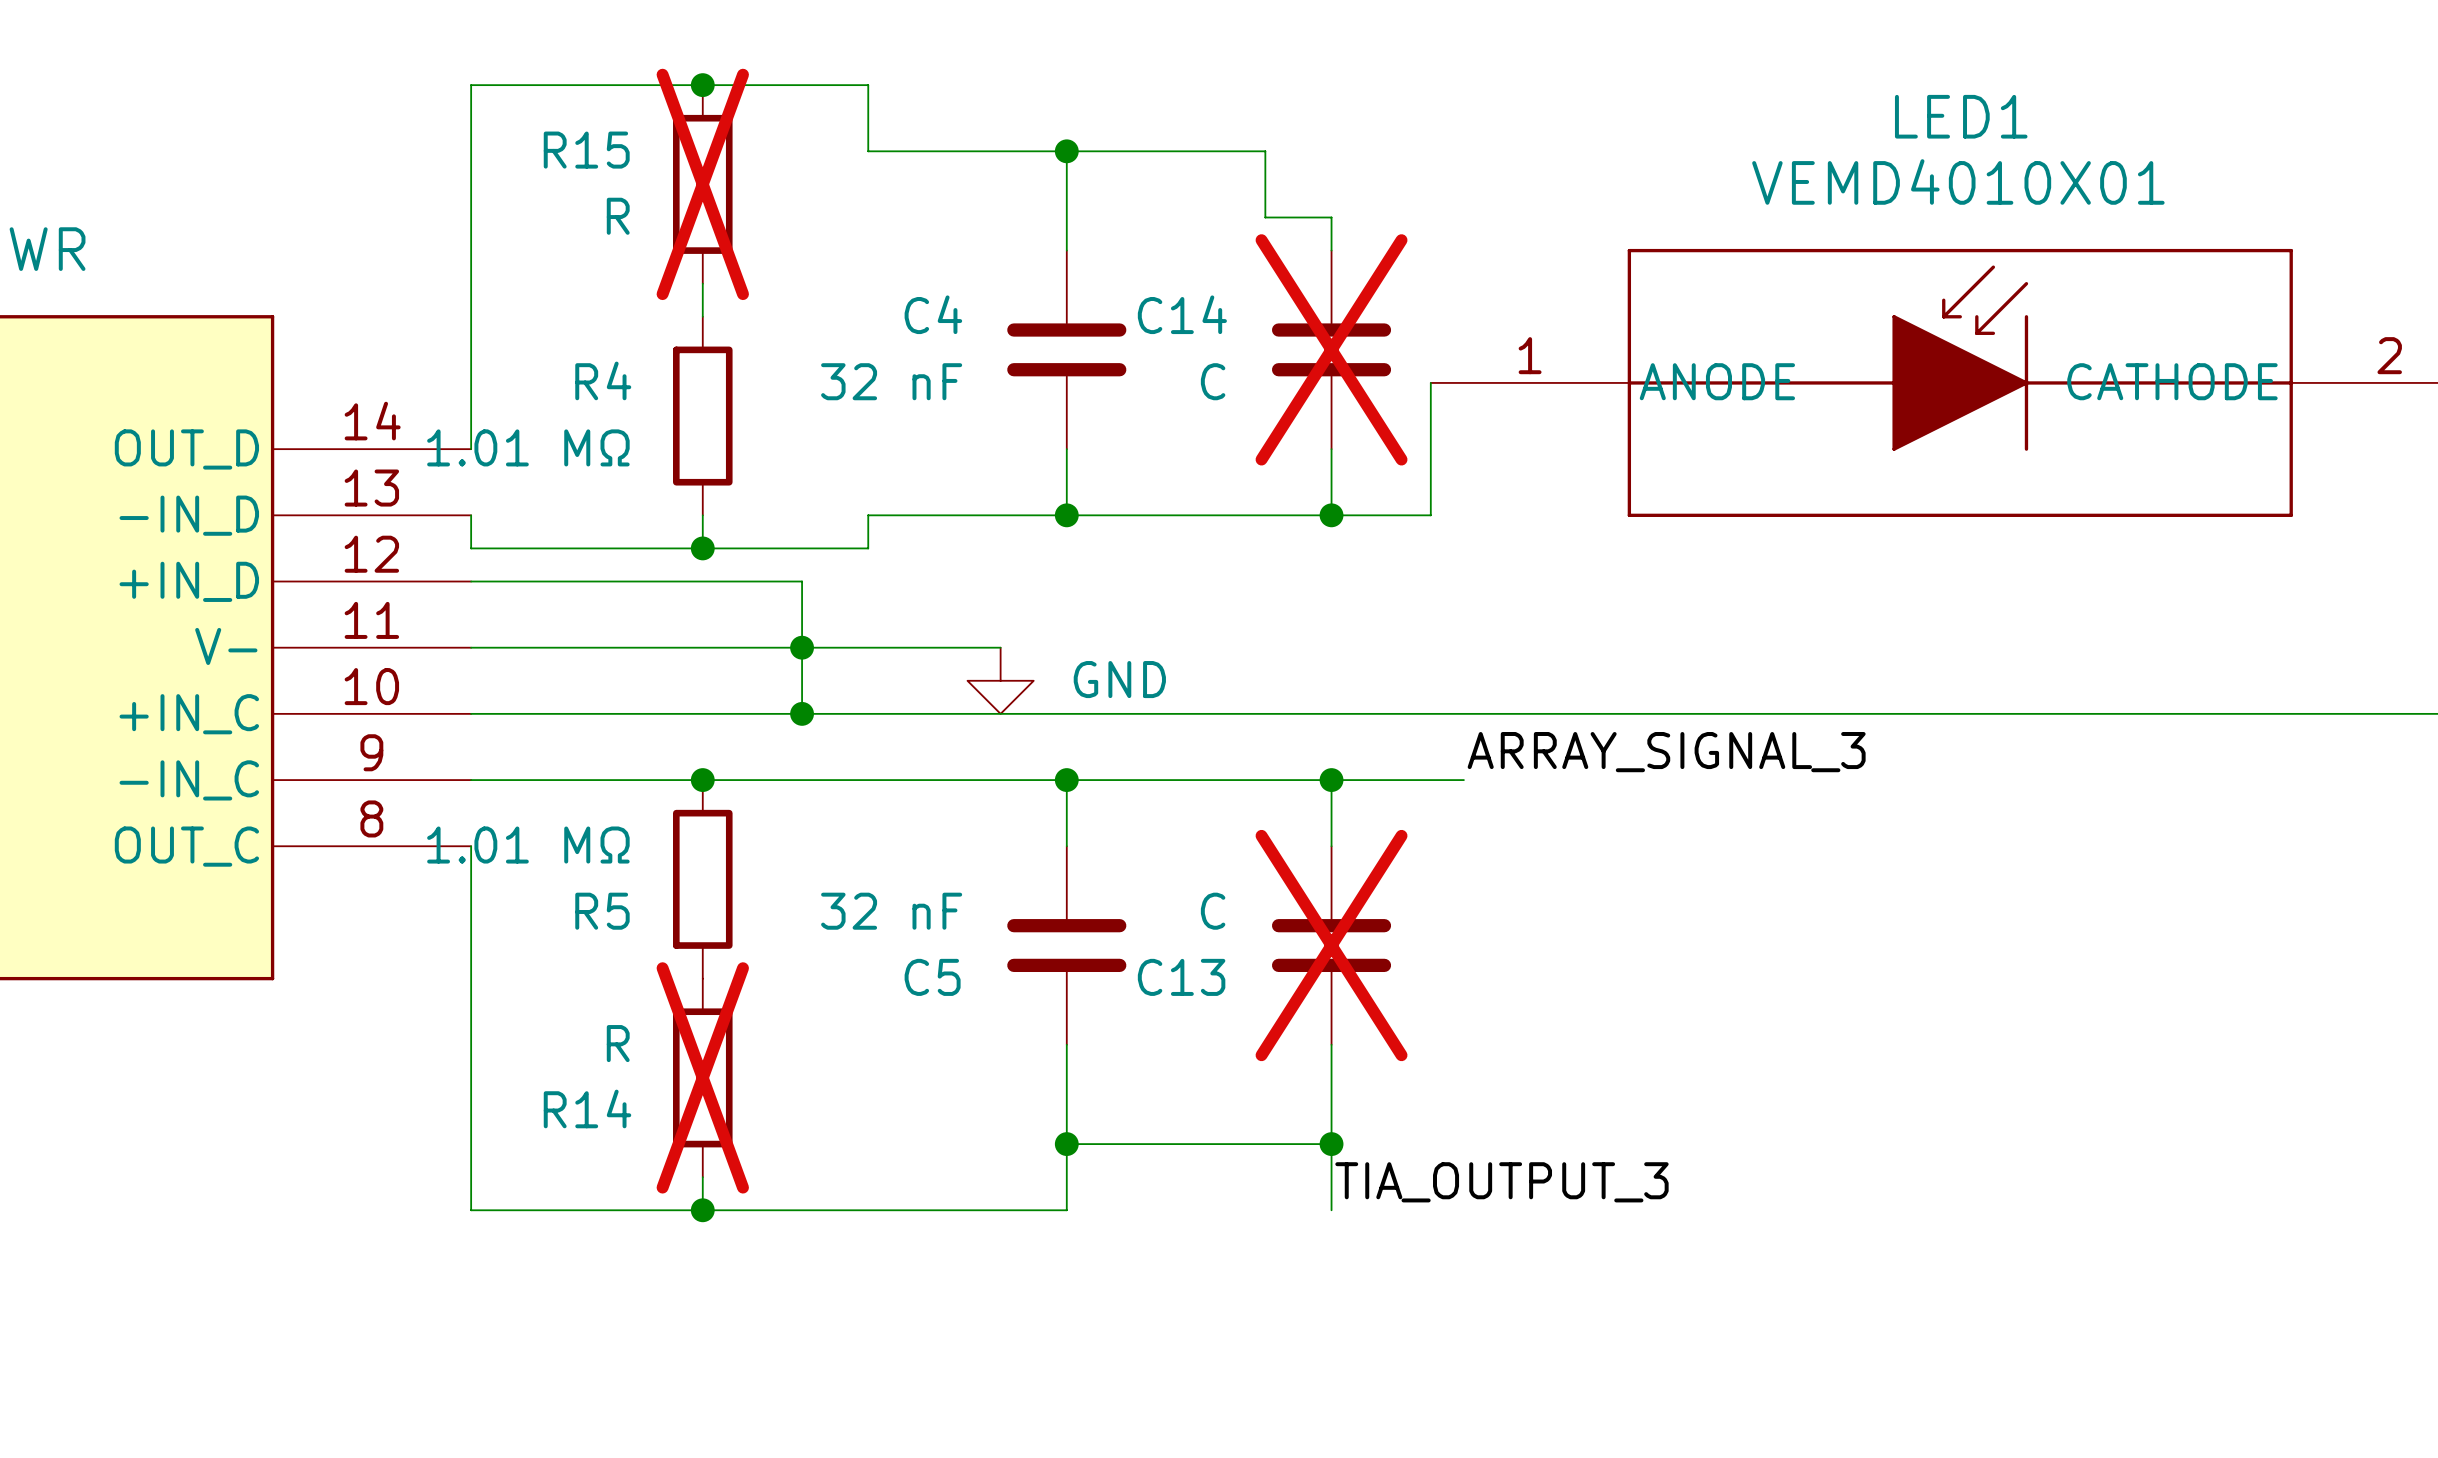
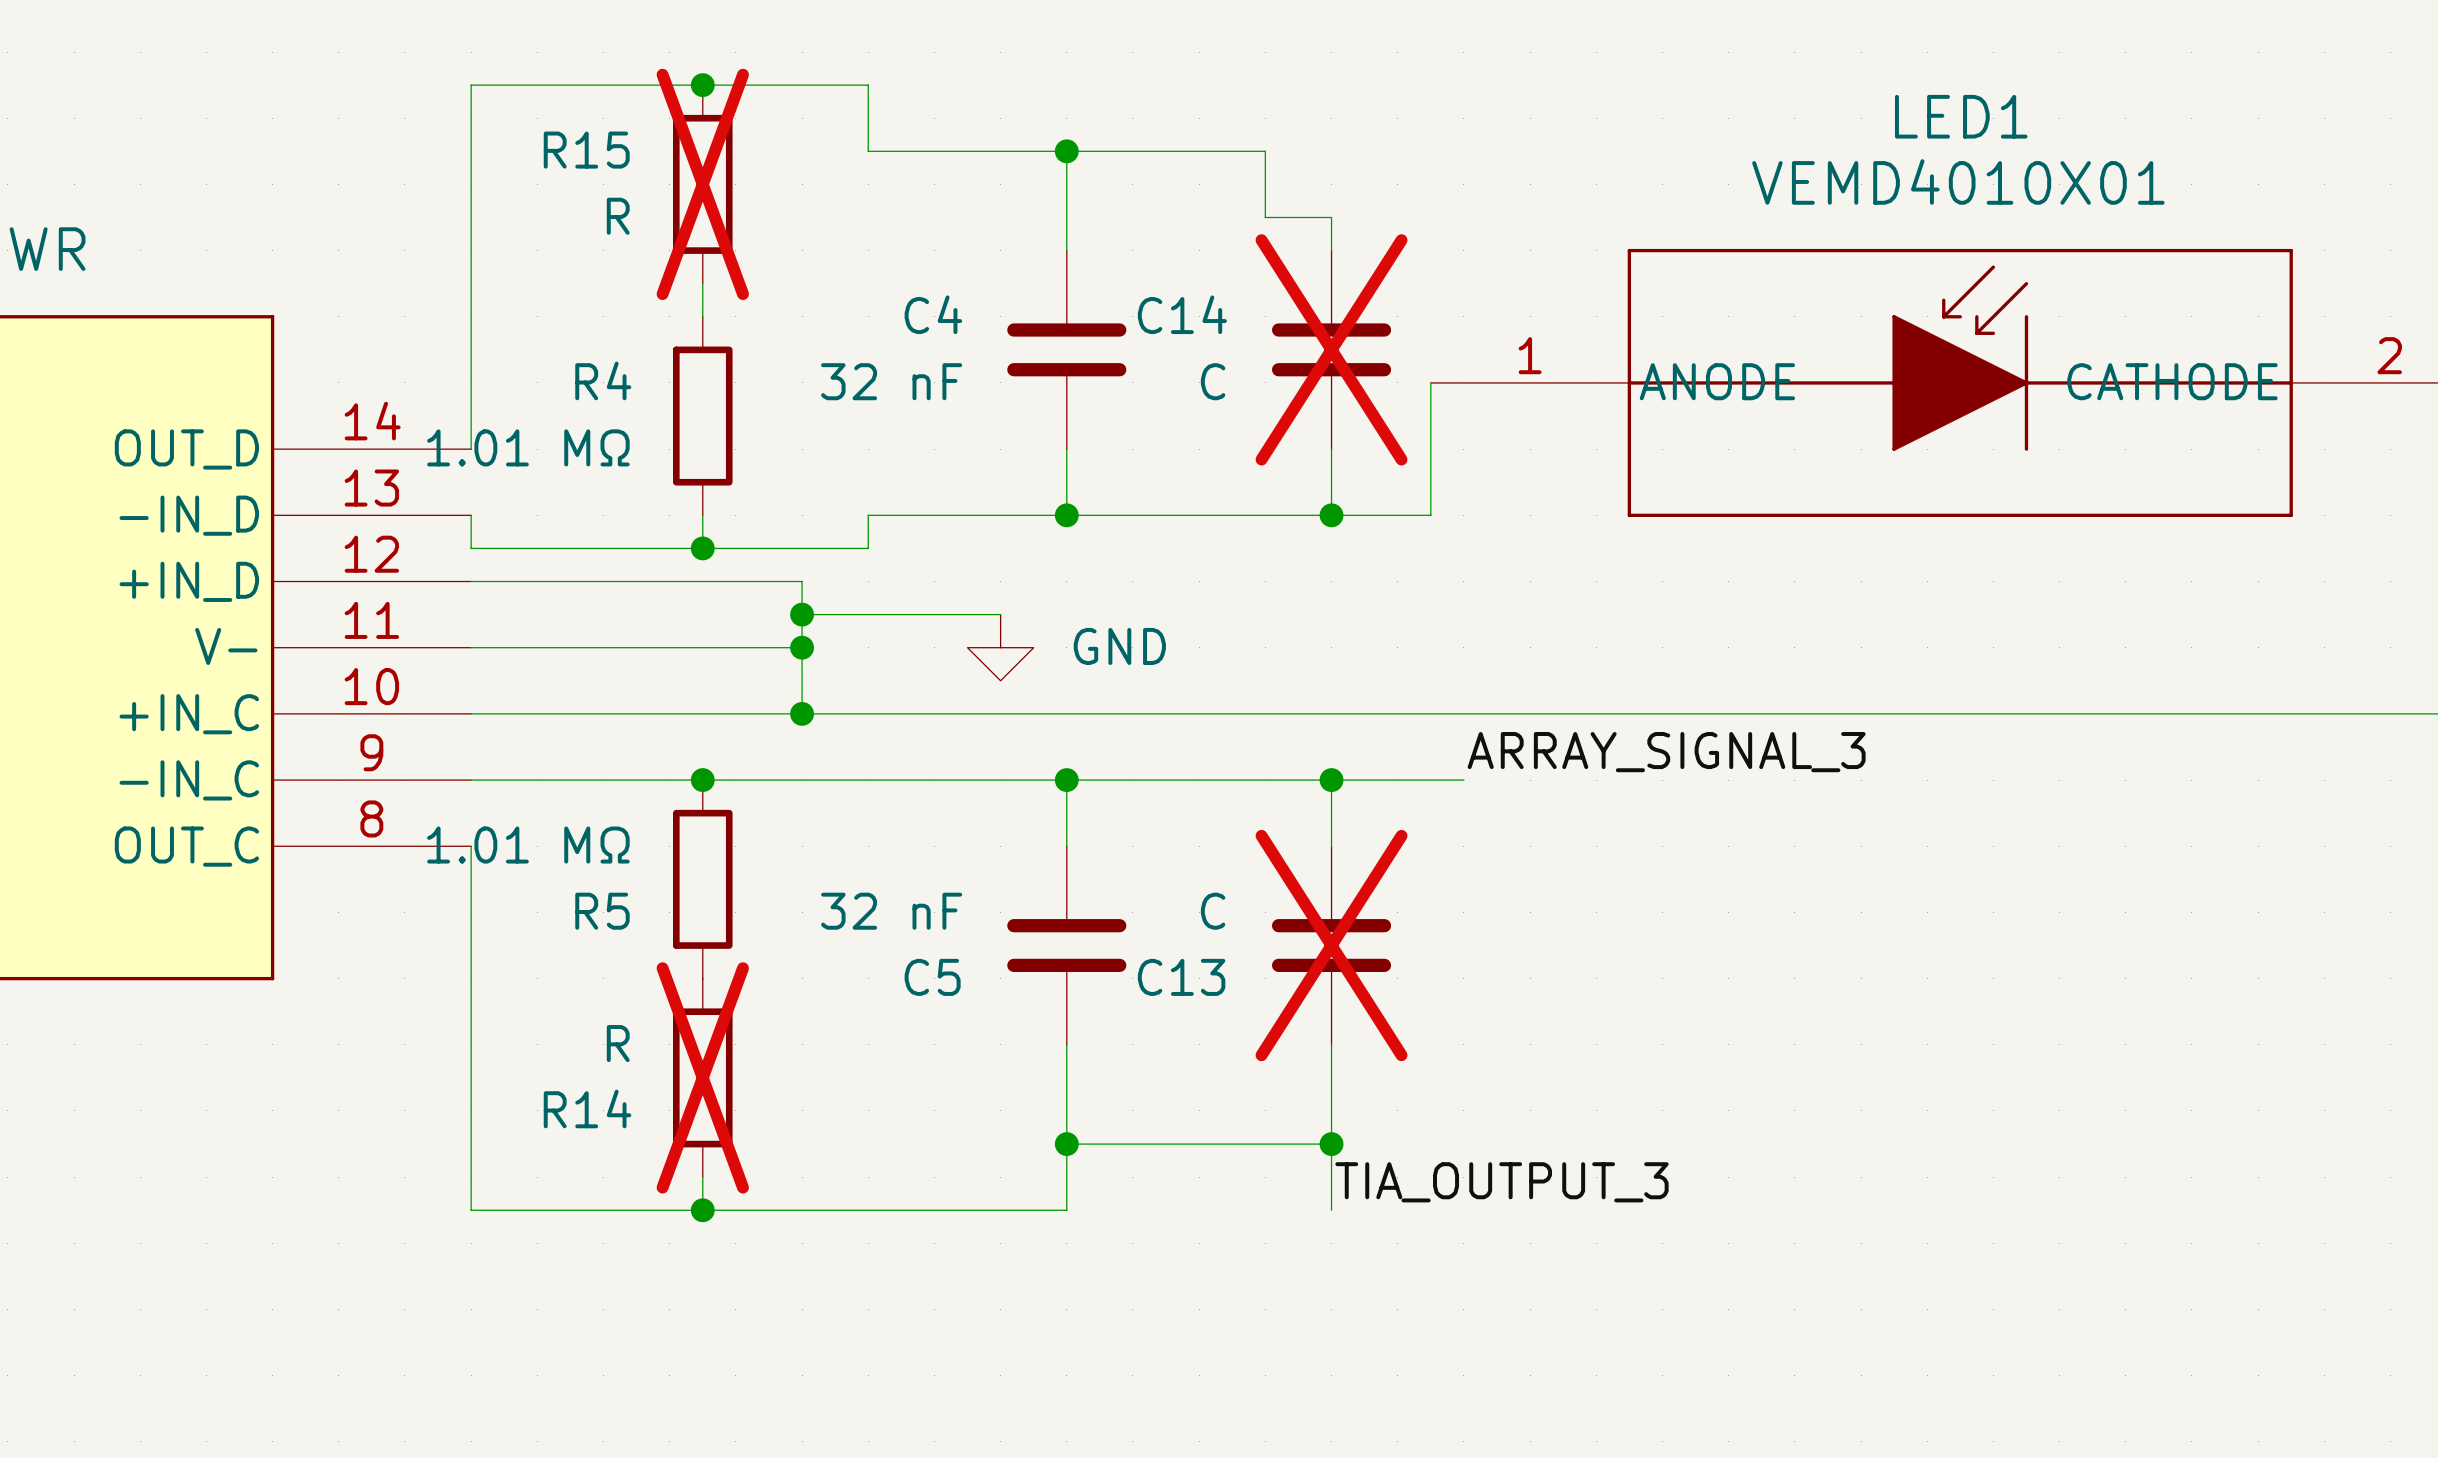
junction: none -> (802, 614)
wire: (802, 647) (1000, 647) -> (802, 614) (1000, 614)
power symbol position: GND (1000, 680) -> GND (1000, 647)

